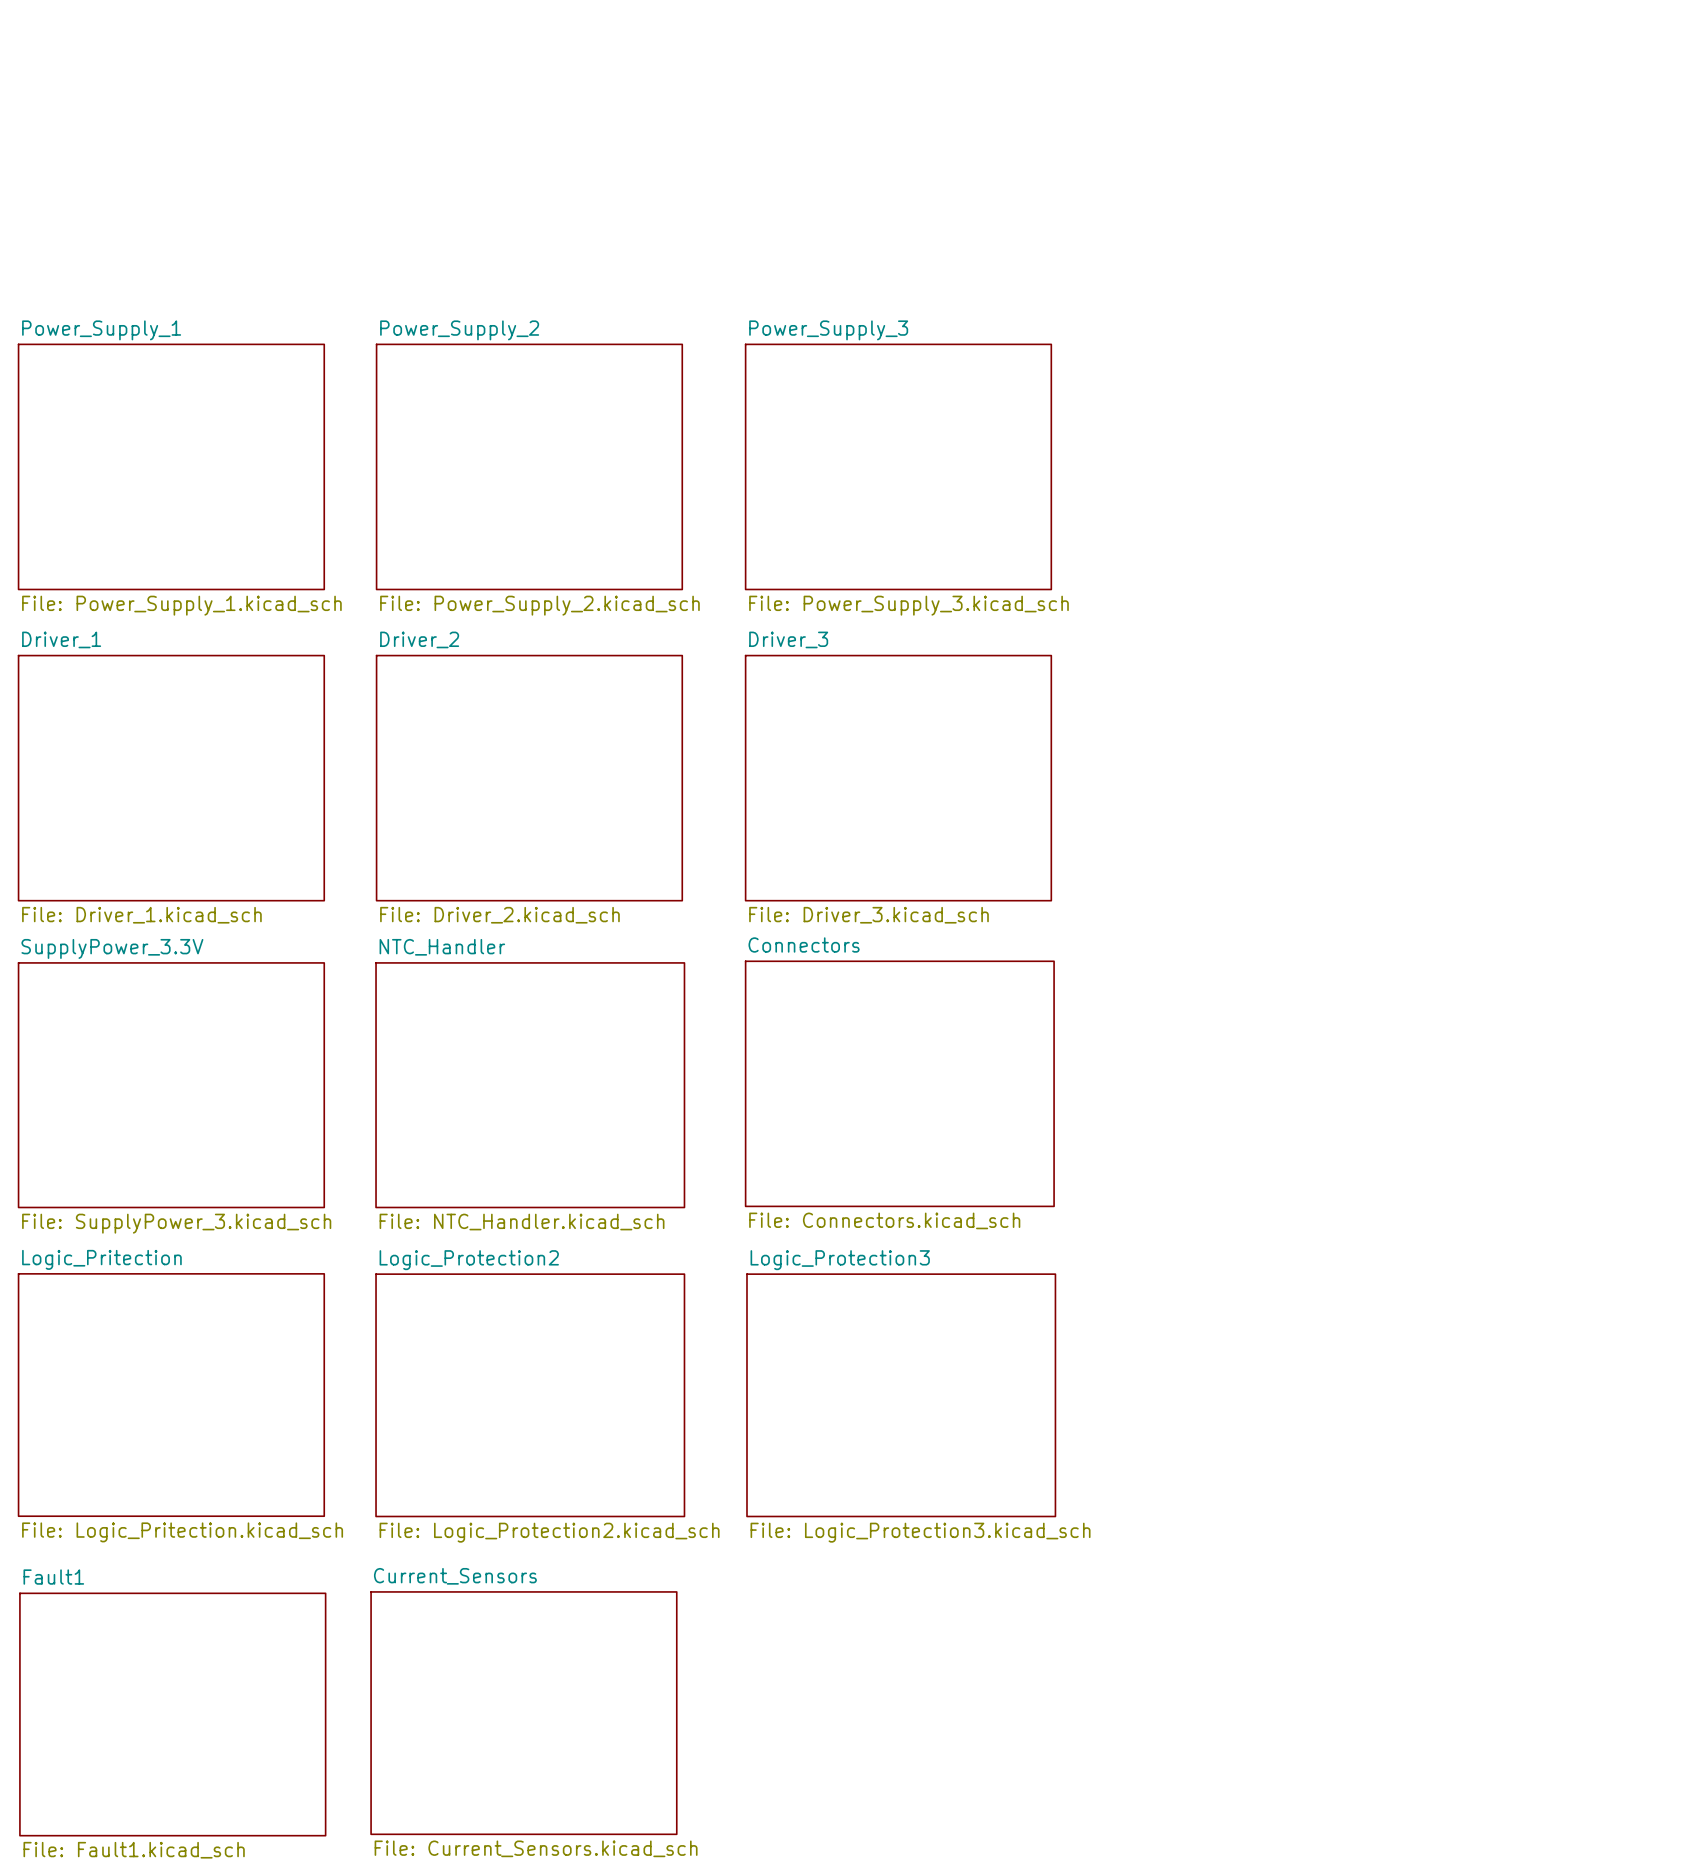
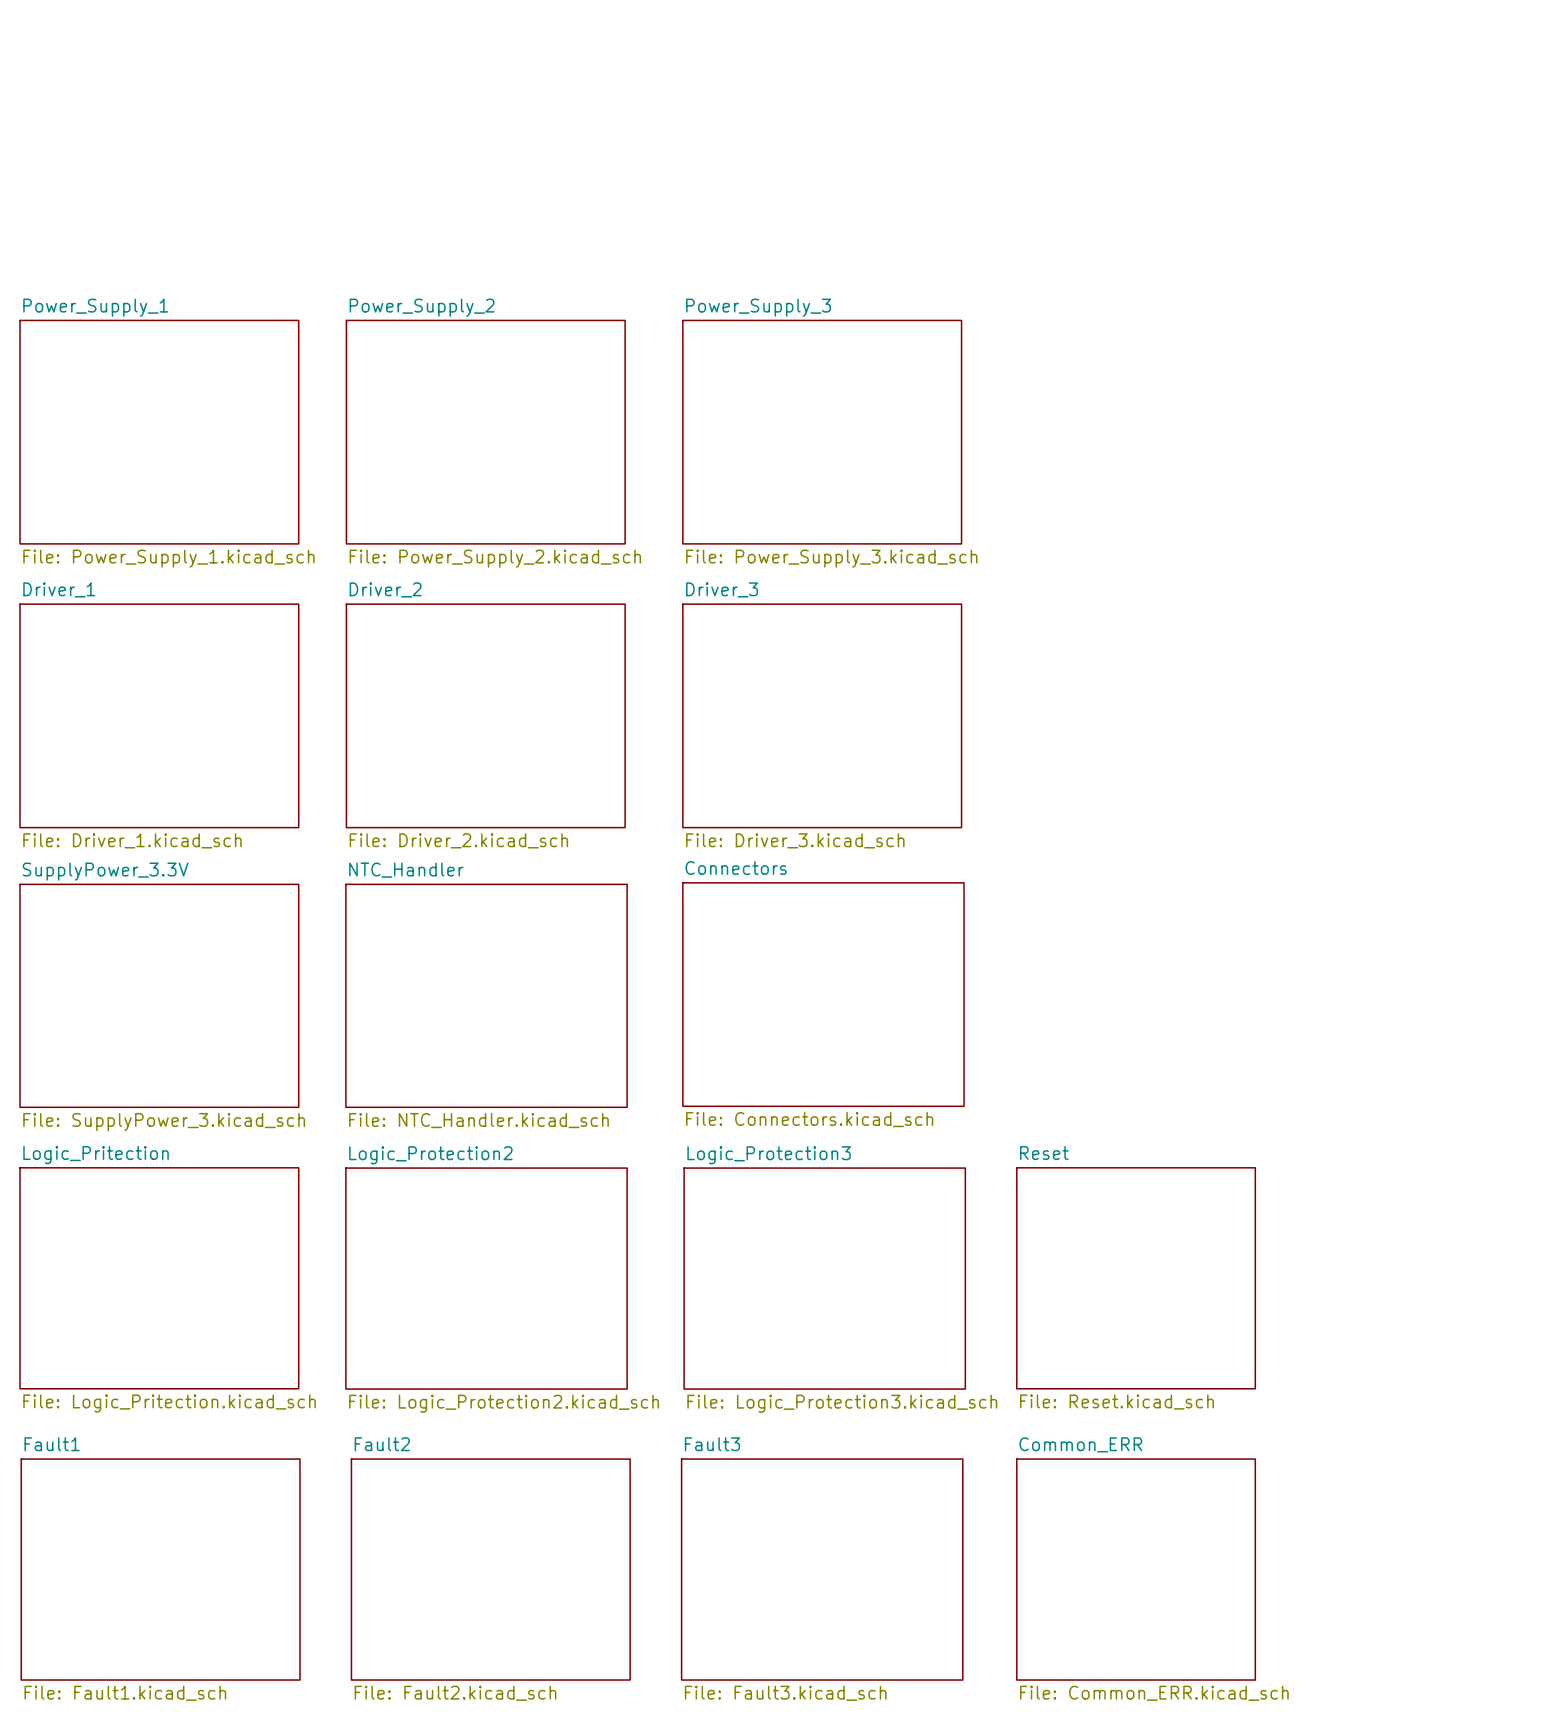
sheet Reset: none -> File: Reset.kicad_sch (1136, 1278)
sheet Current_Sensors: File: Current_Sensors.kicad_sch (523, 1713) -> none
sheet Fault2: none -> File: Fault2.kicad_sch (490, 1569)
sheet Fault3: none -> File: Fault3.kicad_sch (822, 1569)
sheet Common_ERR: none -> File: Common_ERR.kicad_sch (1136, 1569)

